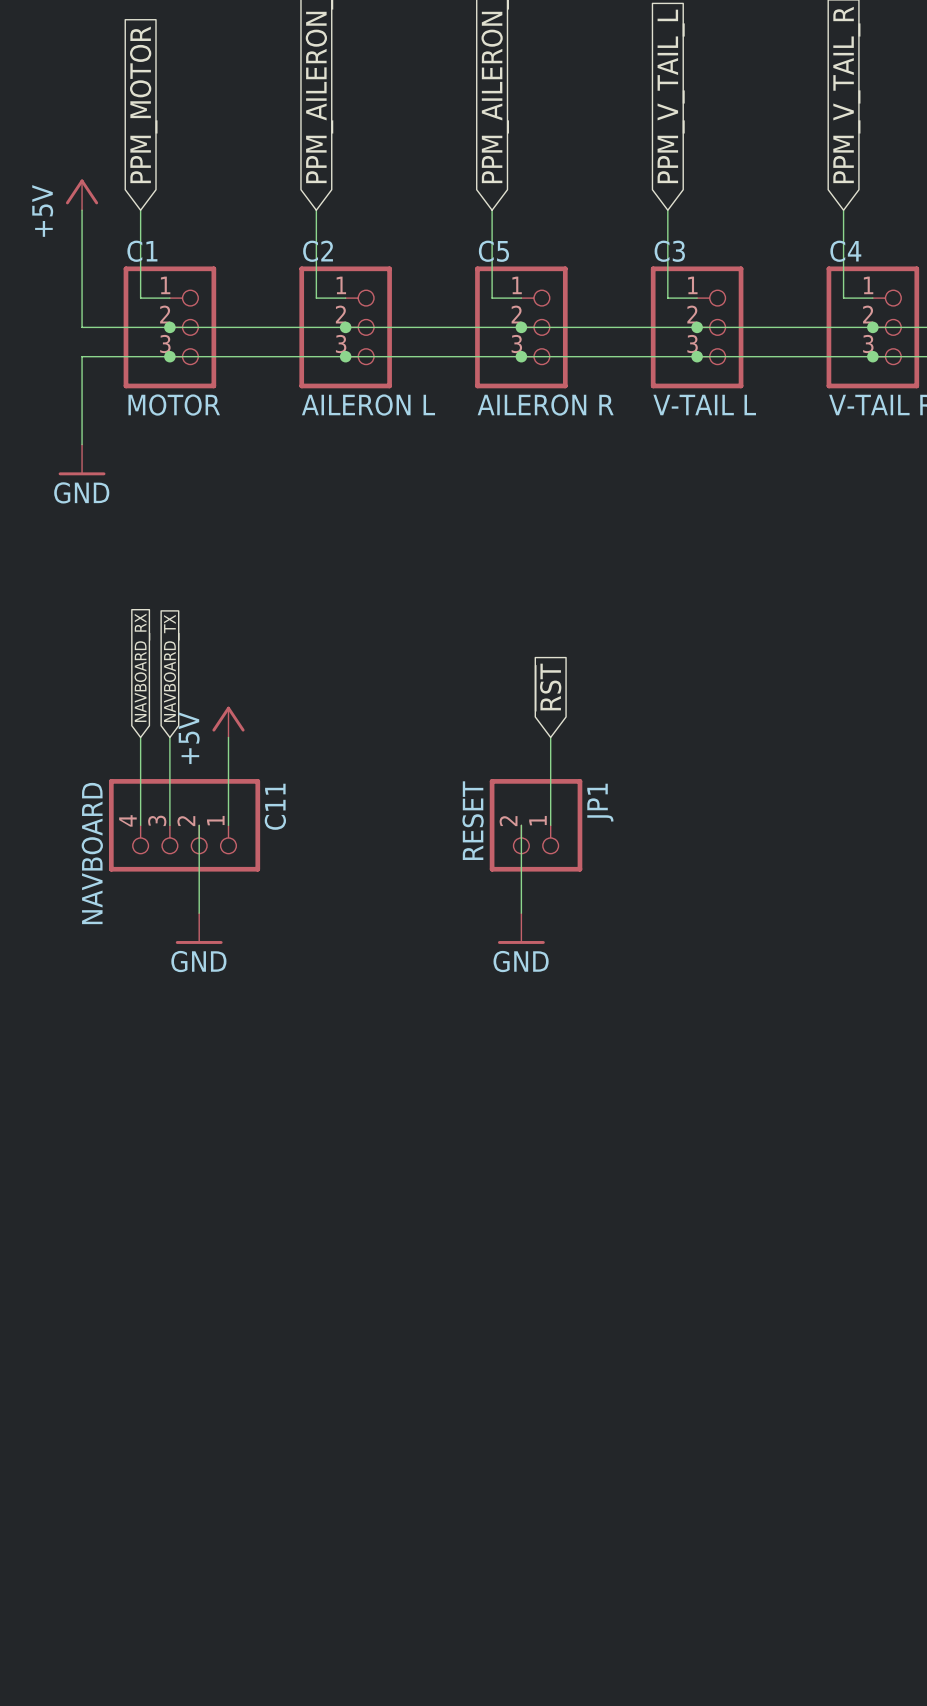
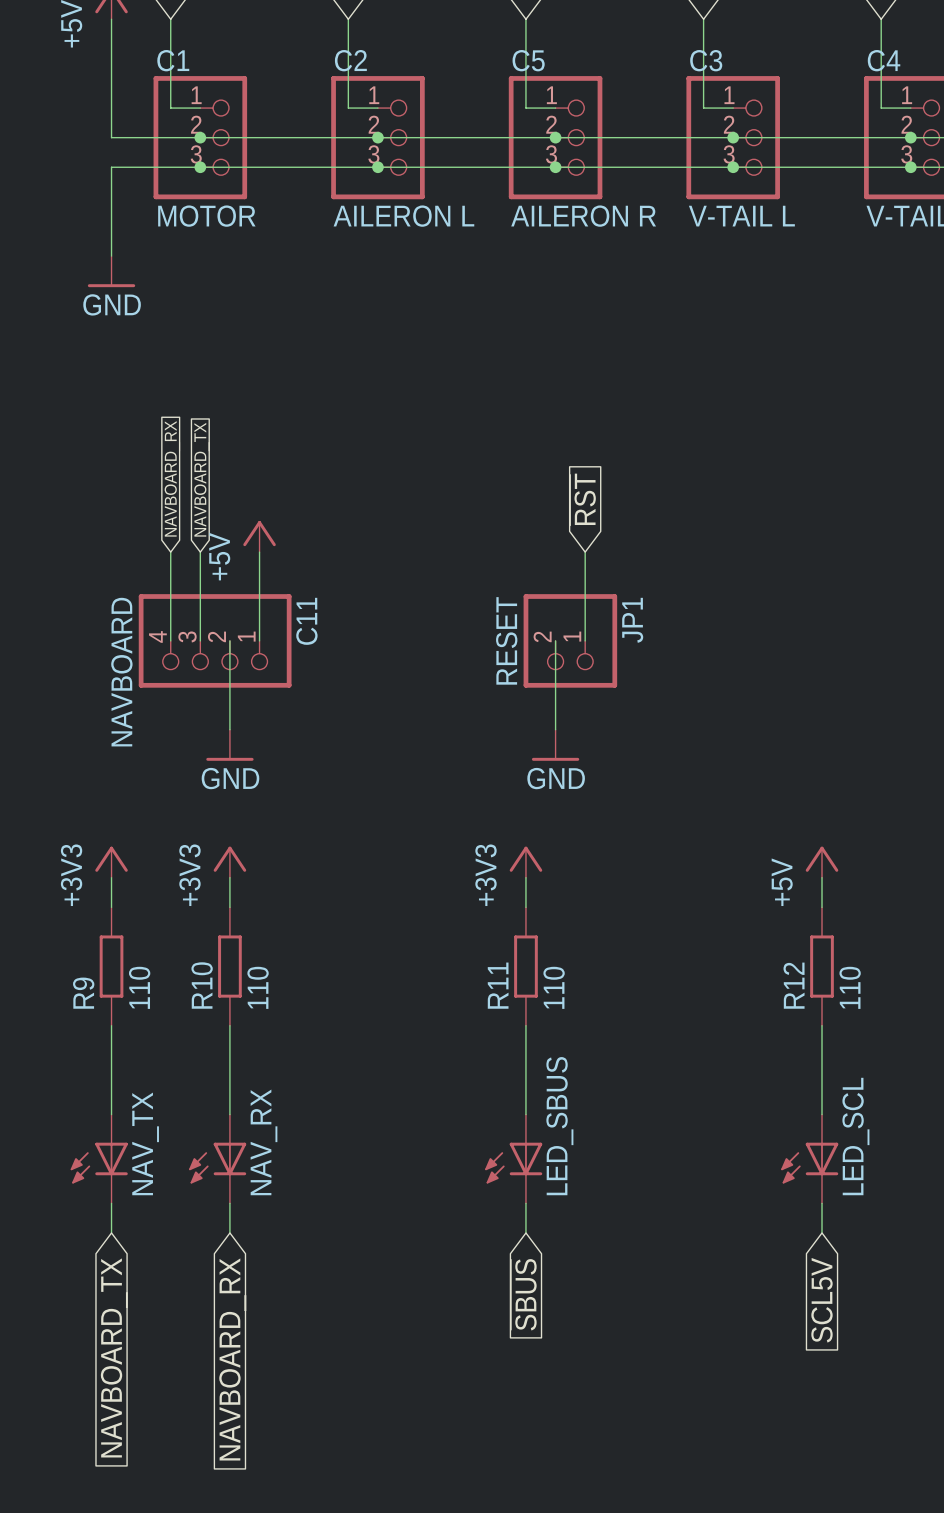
power symbol: none -> +3V3 (111, 862)
power symbol: none -> +3V3 (229, 862)
power symbol: none -> +3V3 (525, 862)
power symbol: none -> +5V (822, 862)
wire: none -> (111, 877) (111, 907)
wire: none -> (229, 877) (229, 907)
wire: none -> (525, 877) (525, 907)
wire: none -> (822, 877) (822, 907)
R9: none -> 110 (111, 966)
R10: none -> 110 (229, 966)
R11: none -> 110 (525, 966)
R12: none -> 110 (822, 966)
wire: none -> (111, 1025) (111, 1114)
wire: none -> (229, 1025) (229, 1114)
wire: none -> (525, 1025) (525, 1114)
wire: none -> (822, 1025) (822, 1114)
NAV_TX: none -> (99, 1158)
NAV_RX: none -> (217, 1158)
LED_SBUS: none -> (513, 1158)
LED_SCL: none -> (809, 1158)
wire: none -> (111, 1203) (111, 1232)
wire: none -> (229, 1203) (229, 1232)
wire: none -> (525, 1203) (525, 1232)
wire: none -> (822, 1203) (822, 1232)
global label: none -> ~{SBUS} (523, 1294)
global label: none -> SCL5V (822, 1300)
global label: none -> NAVBOARD_TX (114, 1357)
global label: none -> NAVBOARD_RX (232, 1359)

